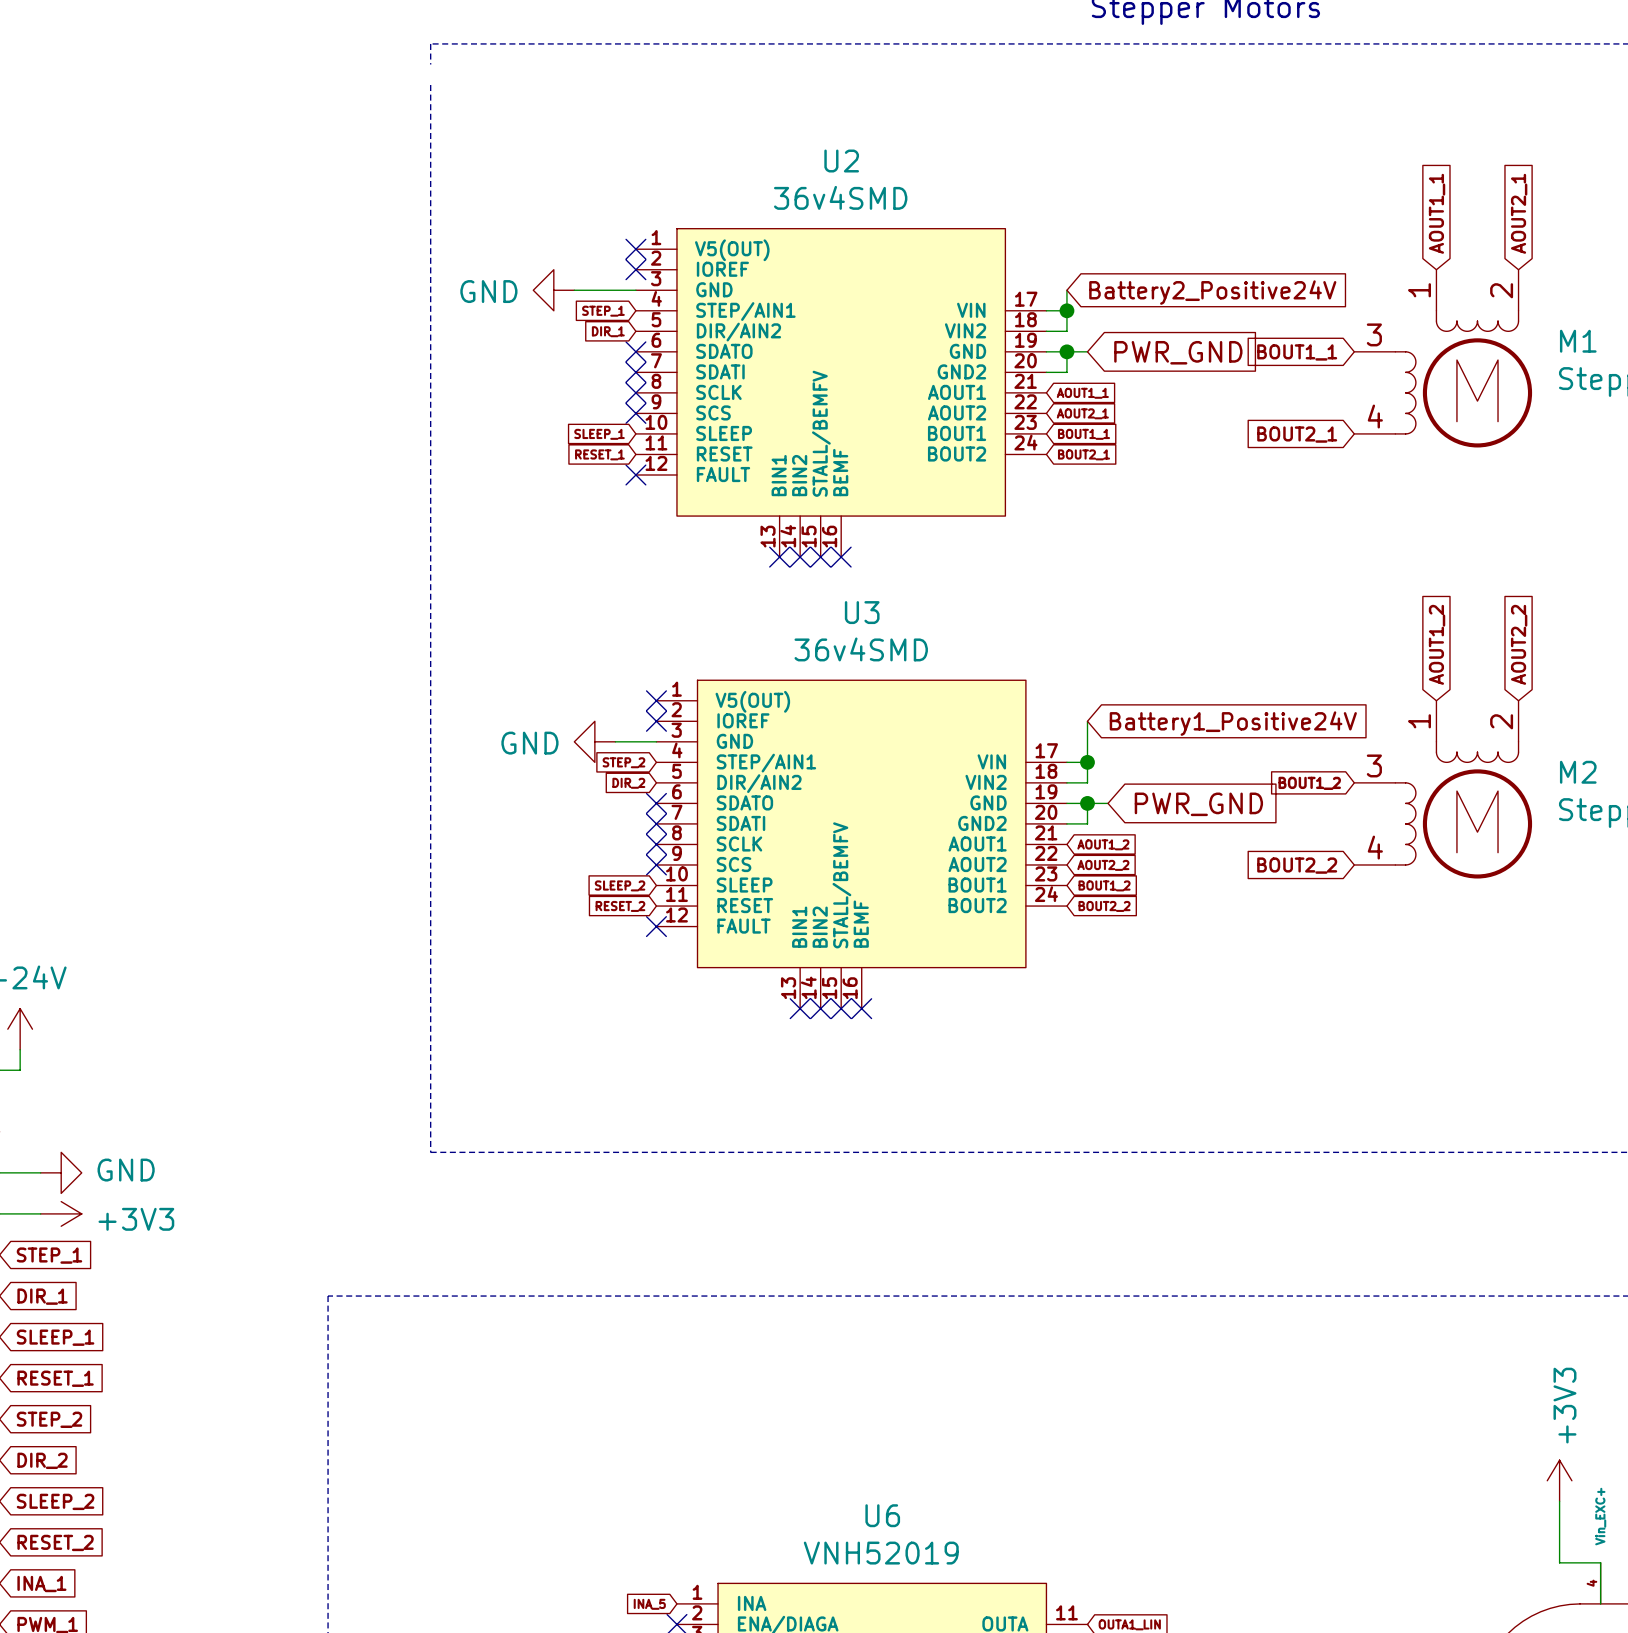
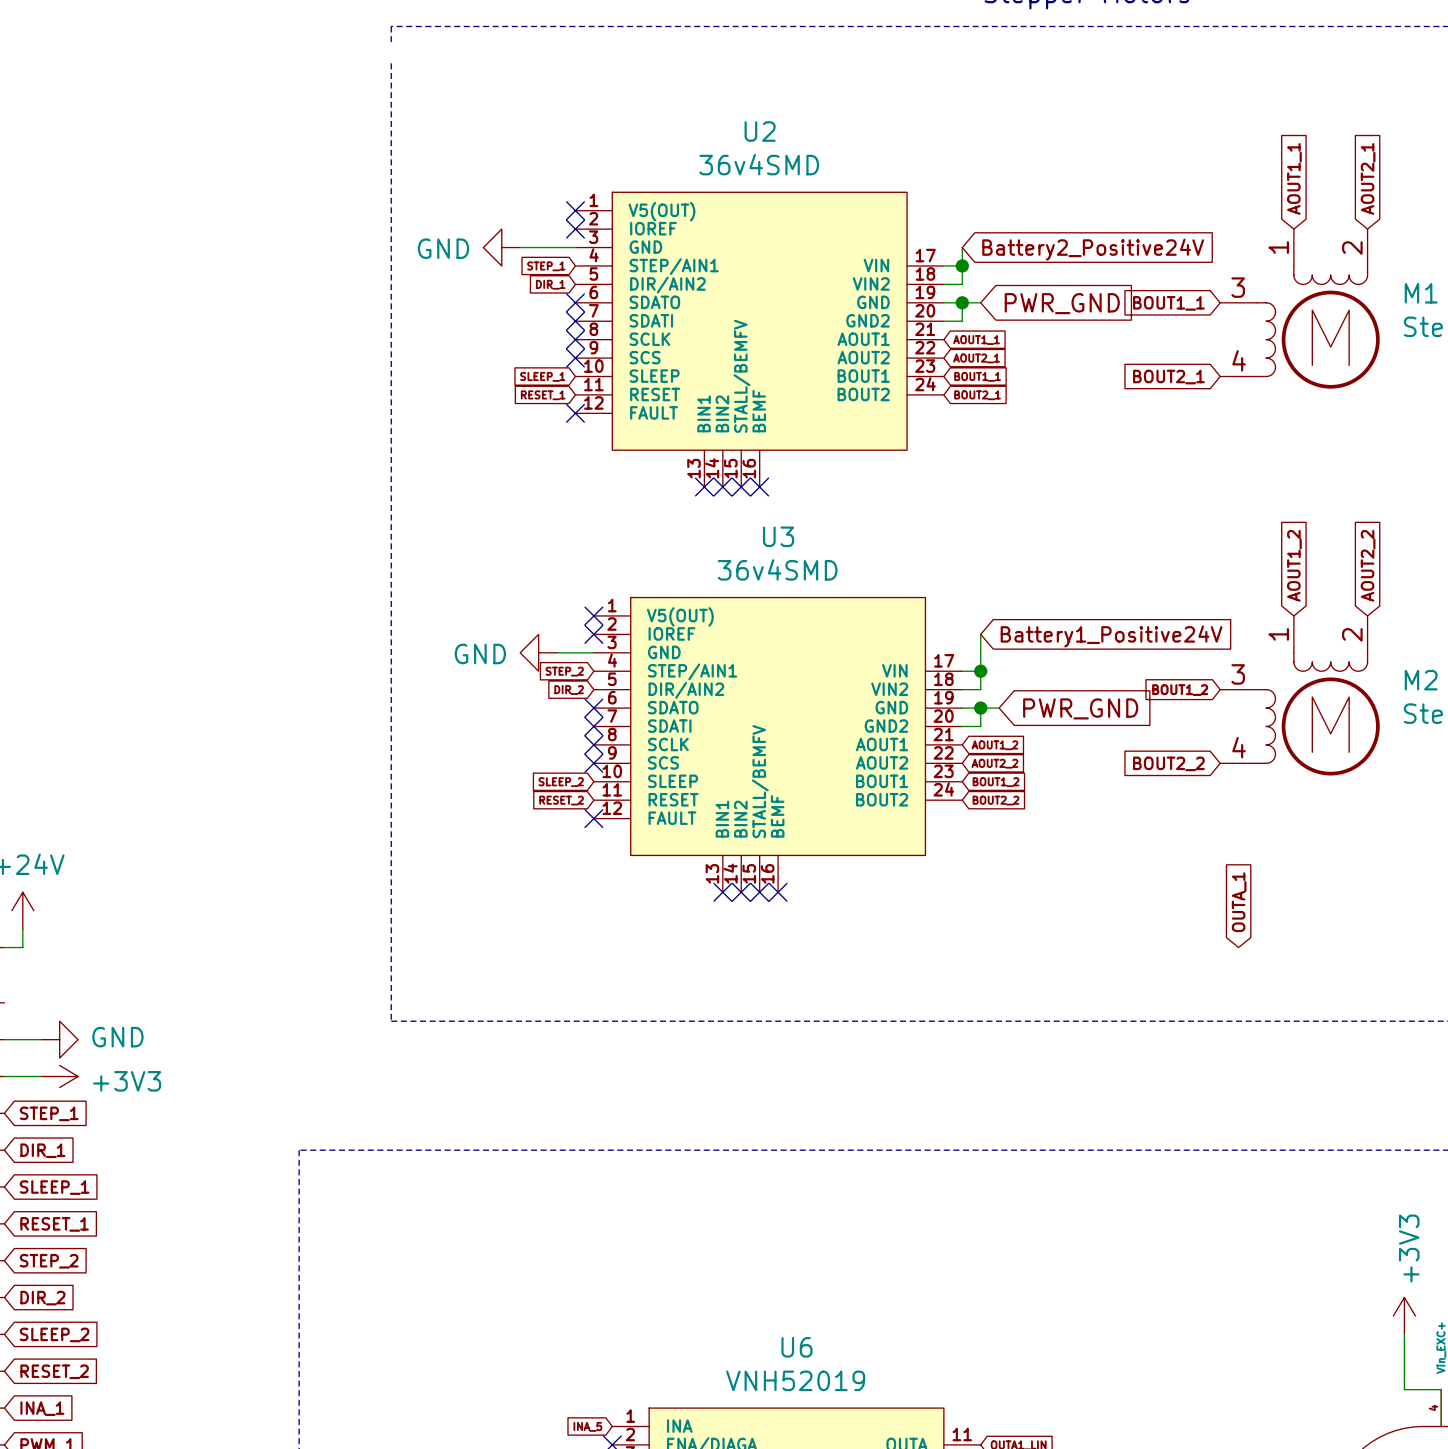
global label: none -> OUTA_1 (1239, 902)

